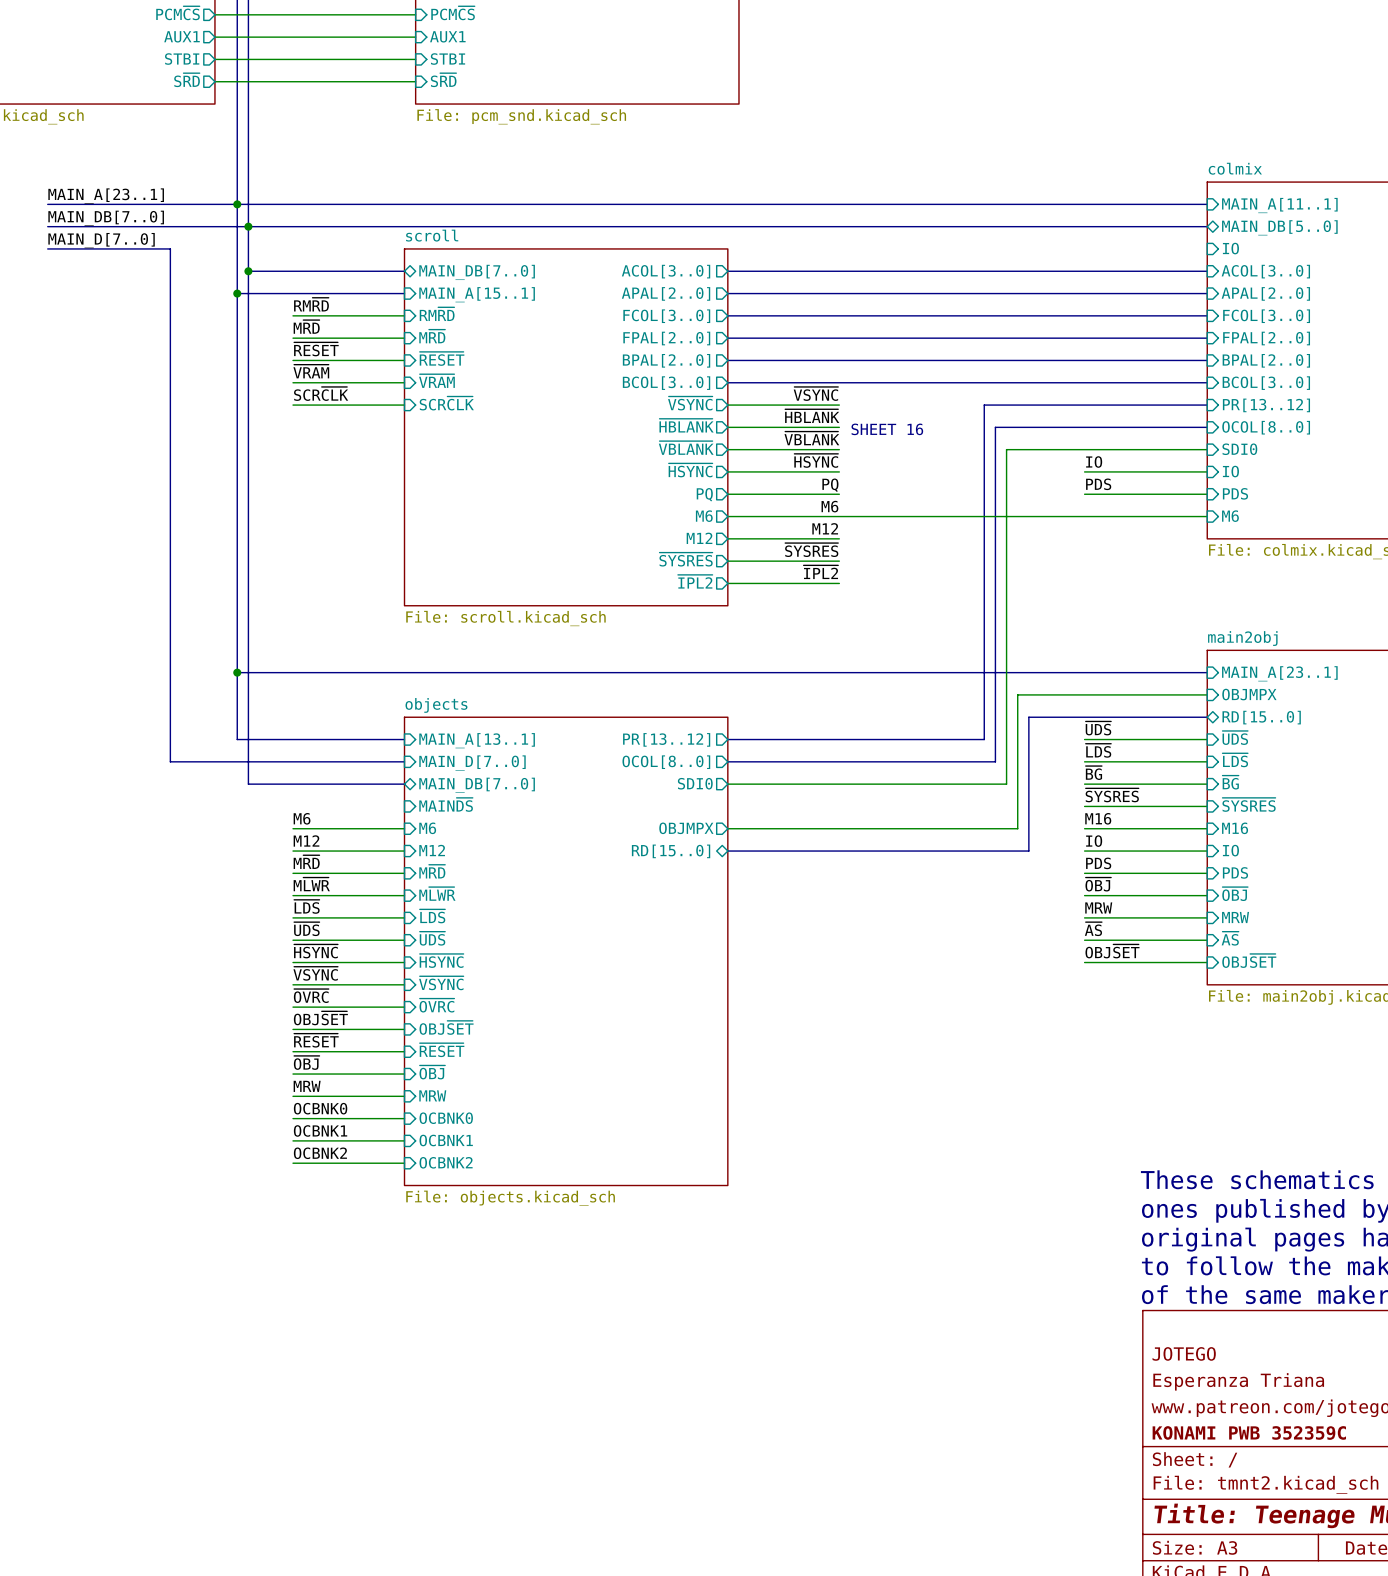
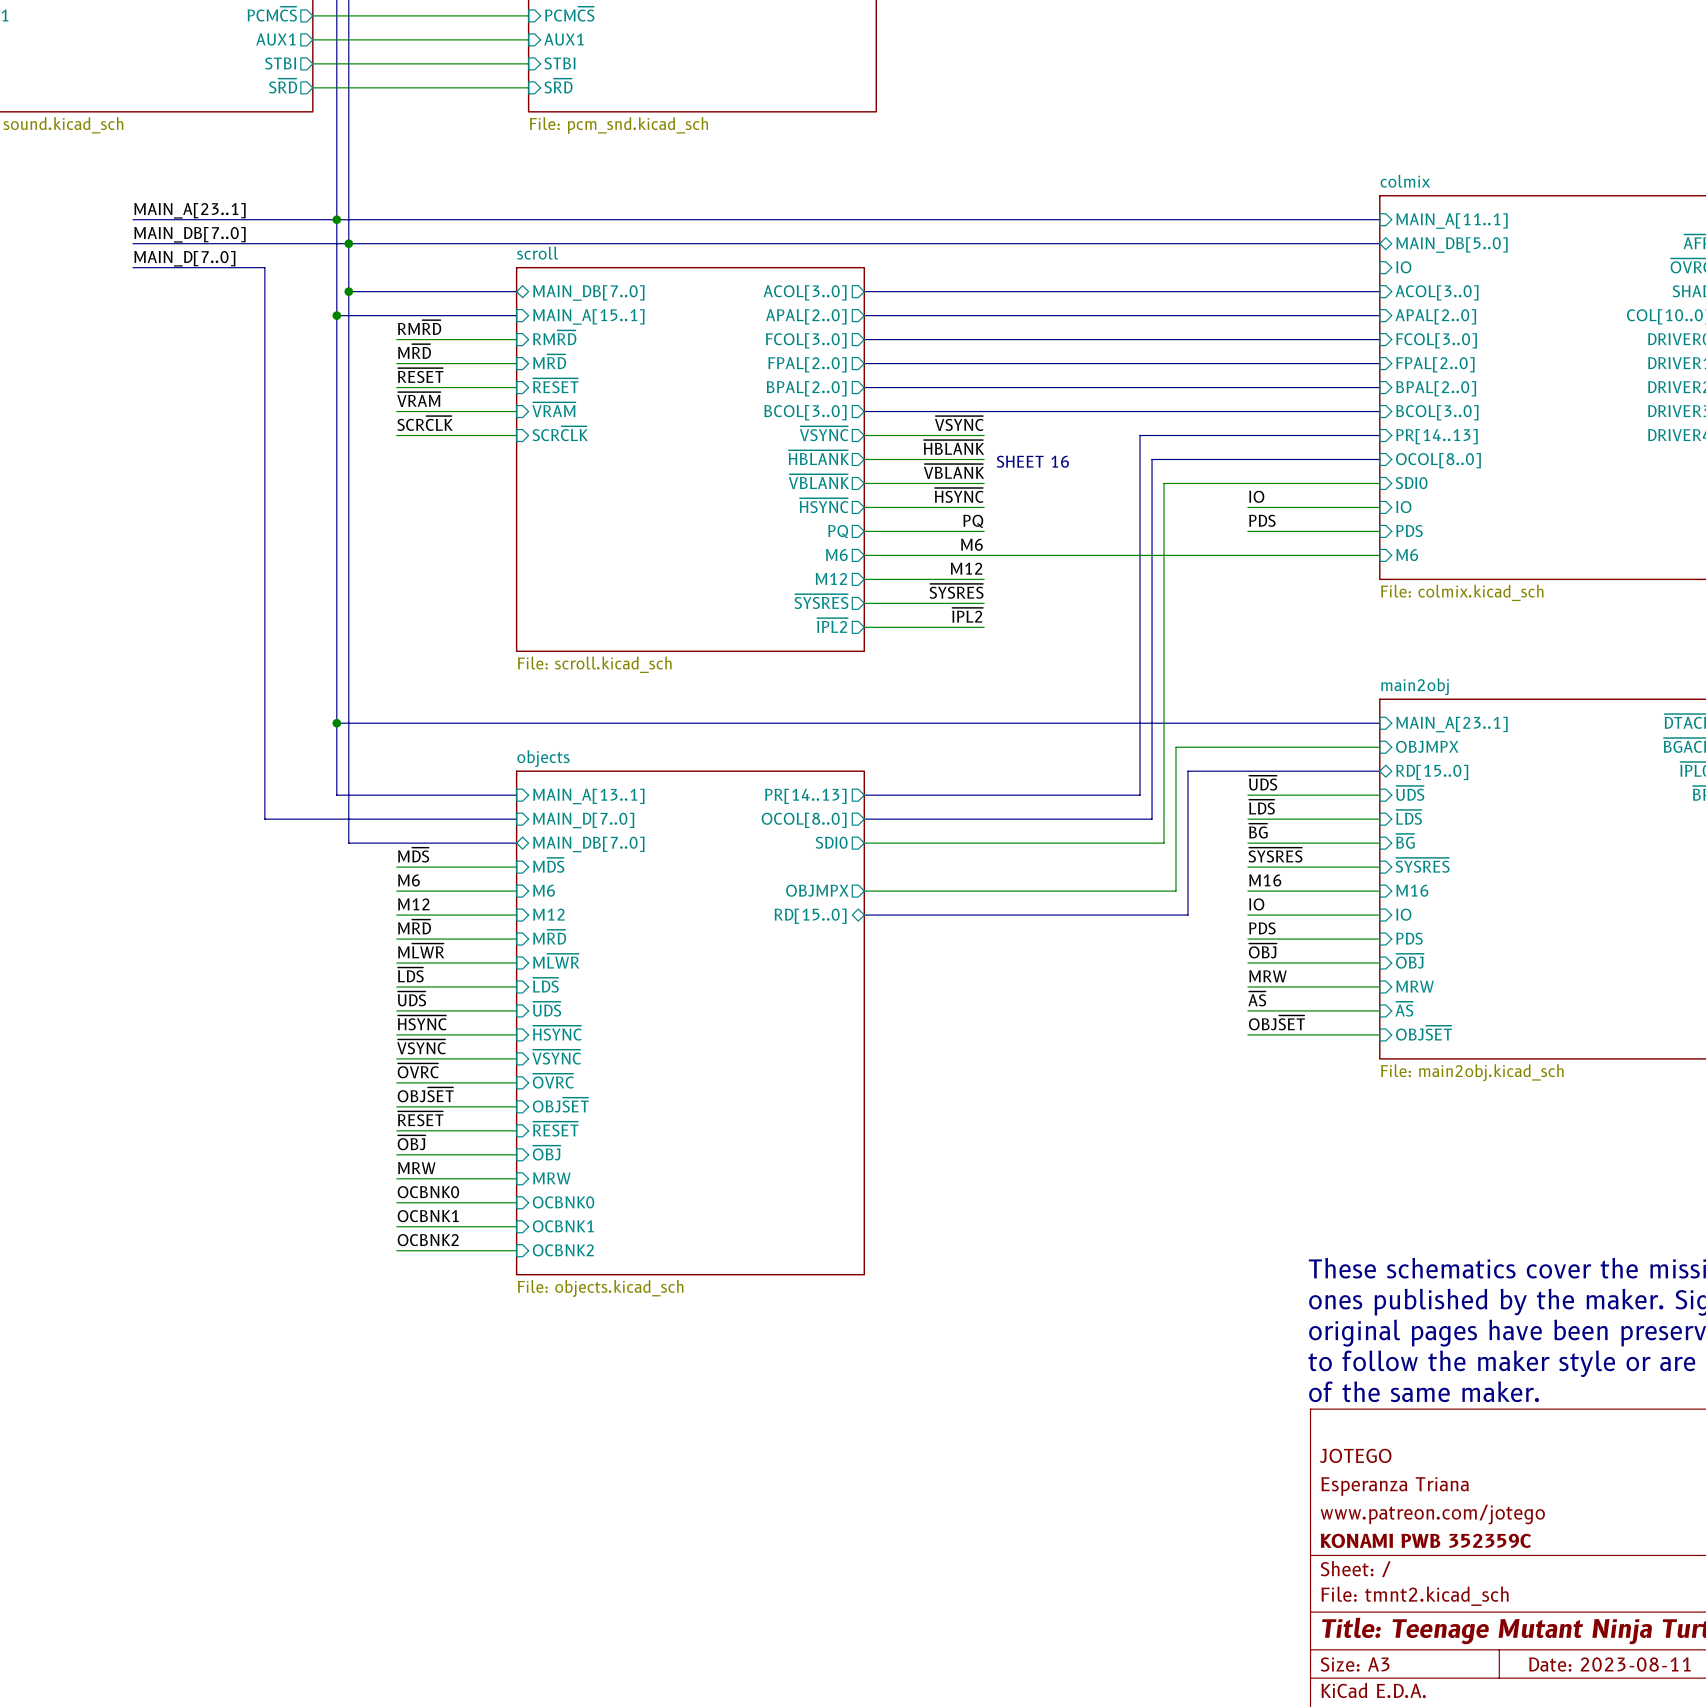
sheet pin: PR[13..12] (1266, 405) -> PR[14..13] (1437, 436)
sheet pin: PR[13..12] (666, 739) -> PR[14..13] (805, 796)
label: none -> M~{DS} (413, 855)
sheet pin: MAIN~{DS} (446, 804) -> M~{DS} (548, 865)
wire: none -> (396, 867) (516, 867)

